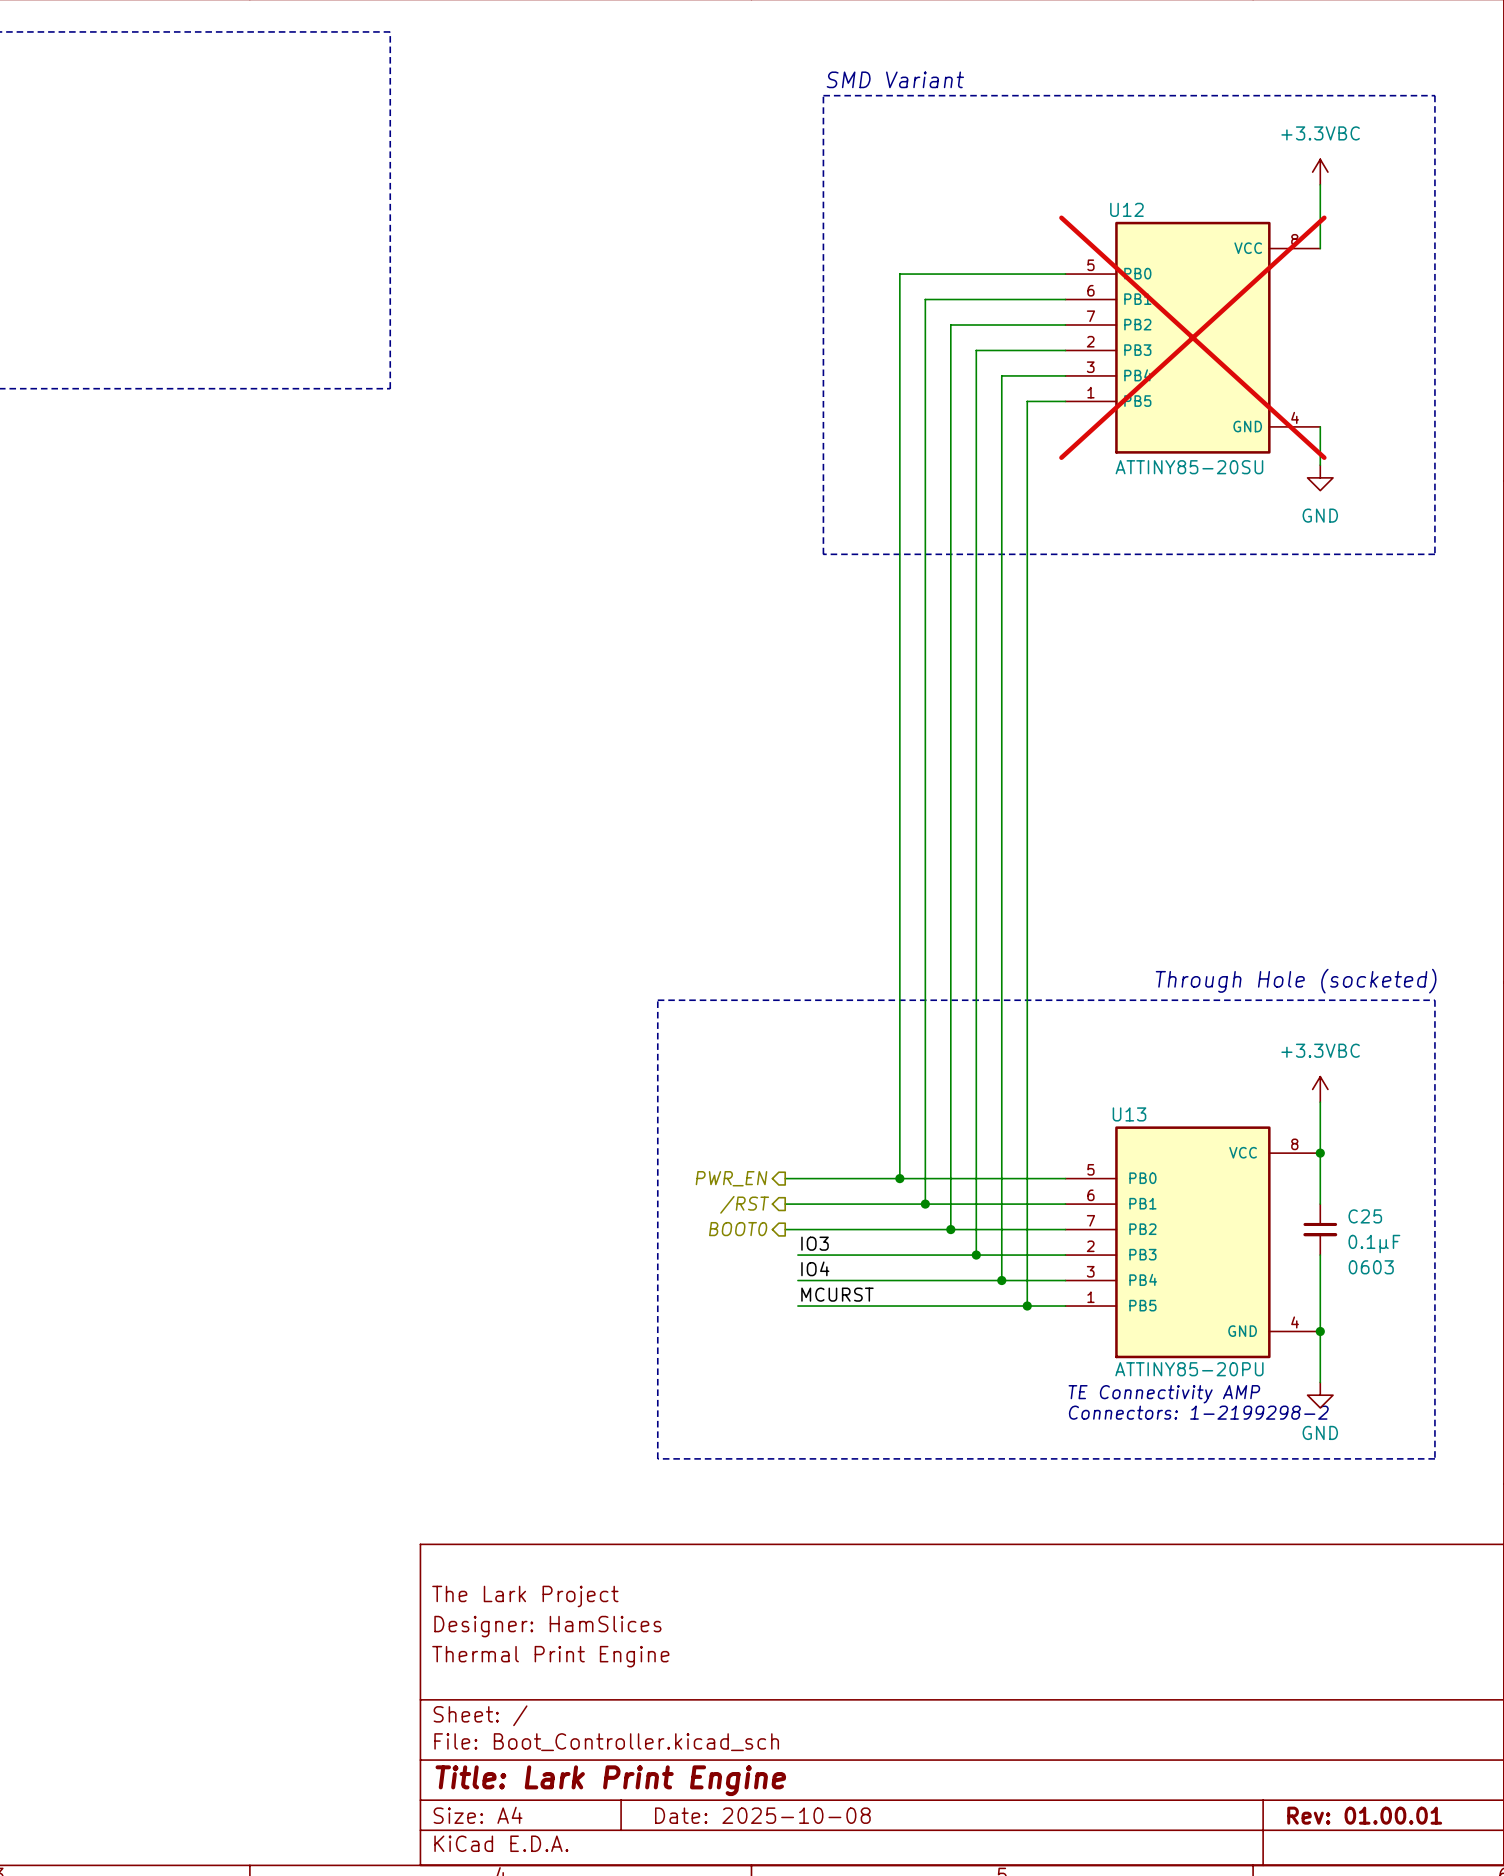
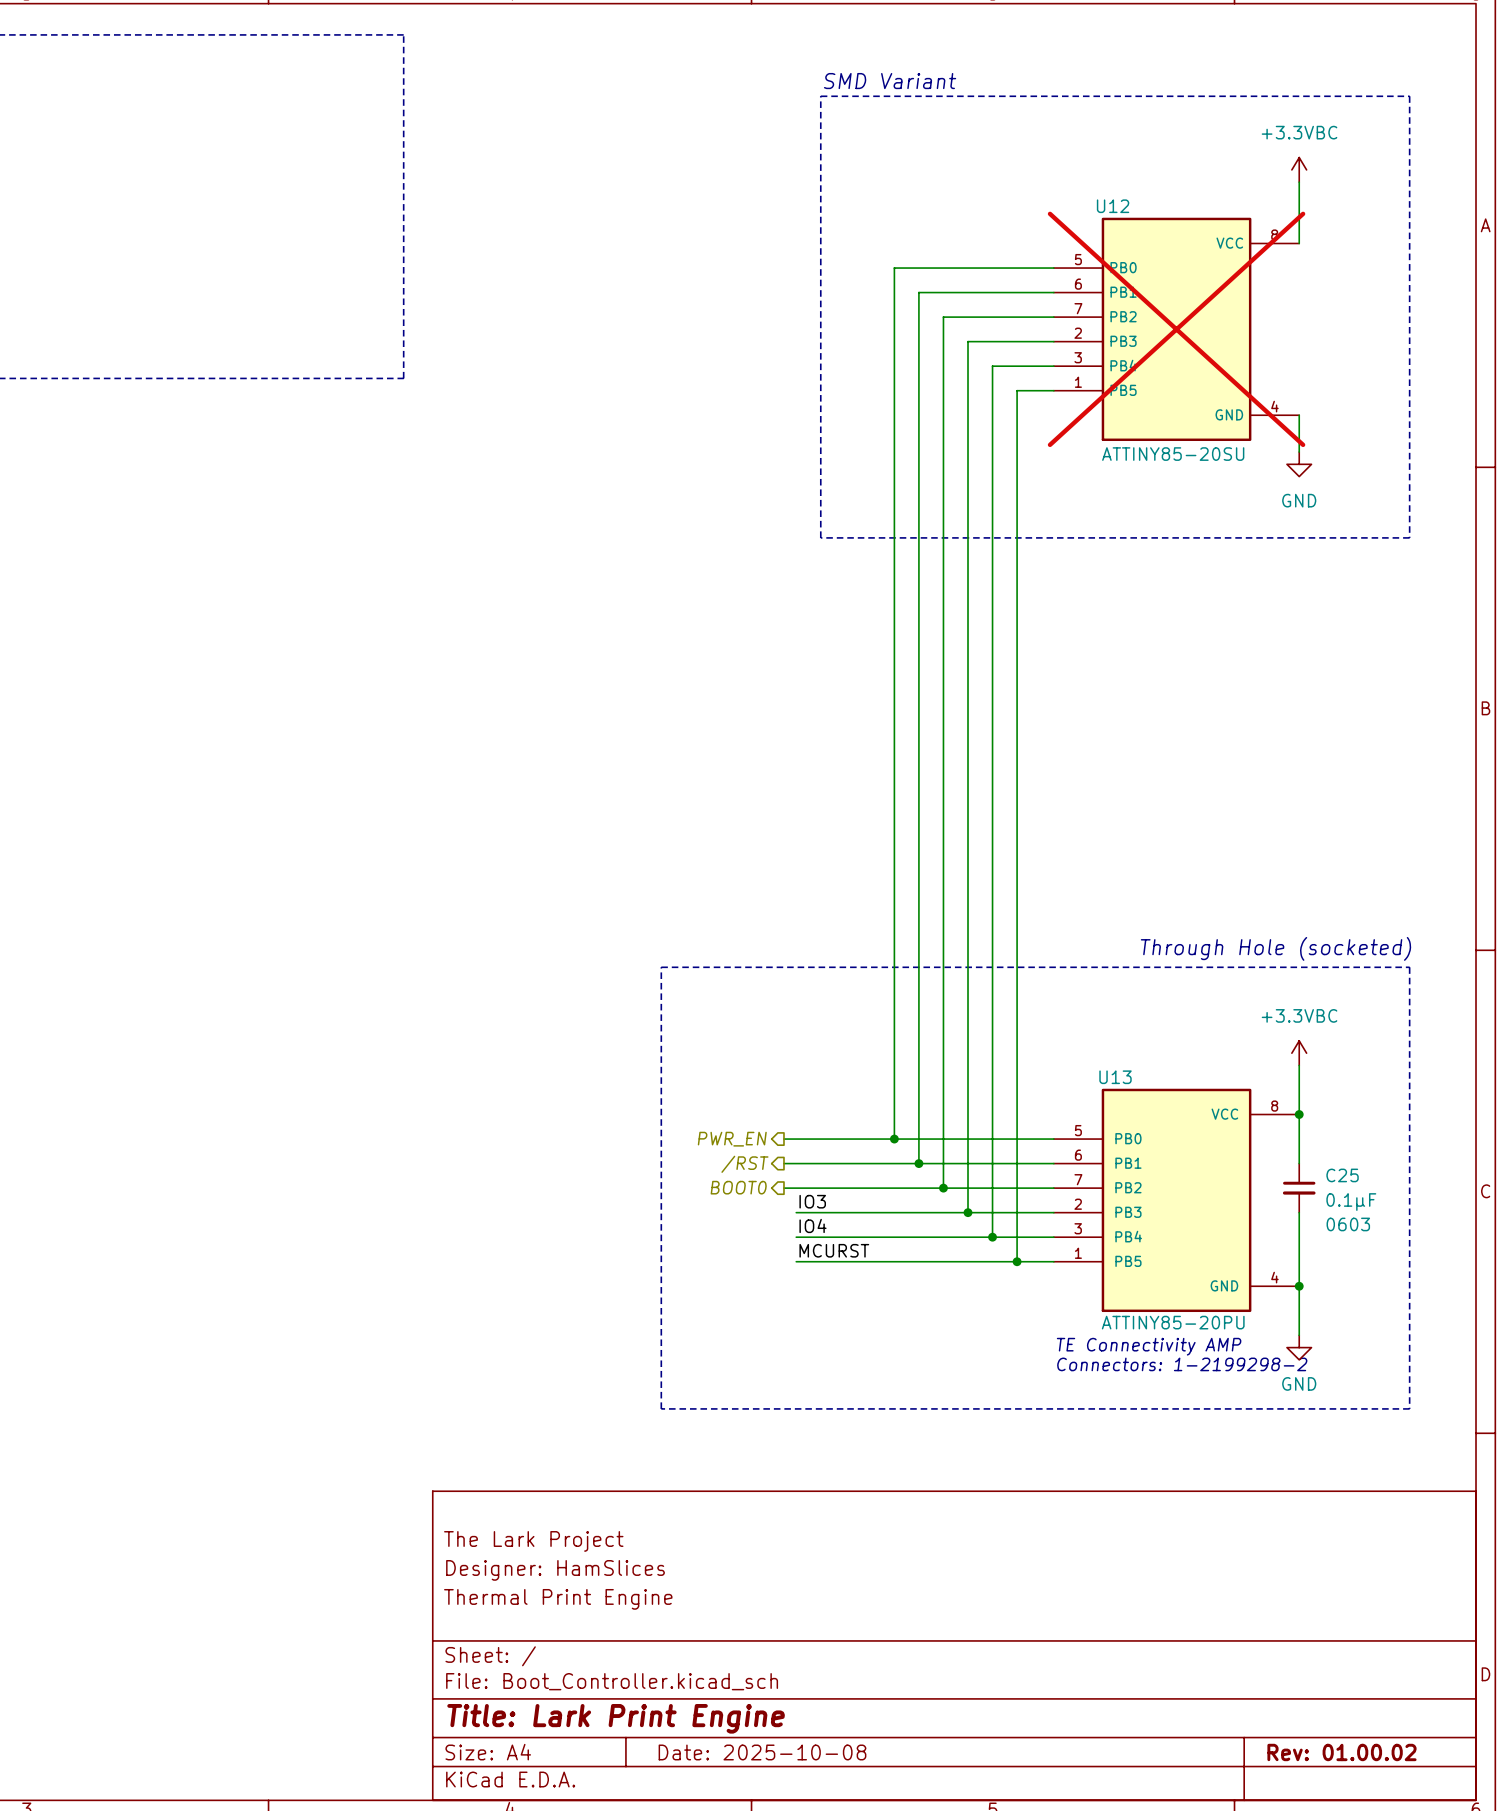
title block: Rev: 01.00.01 (1364, 1815) -> Rev: 01.00.02 (1341, 1752)

